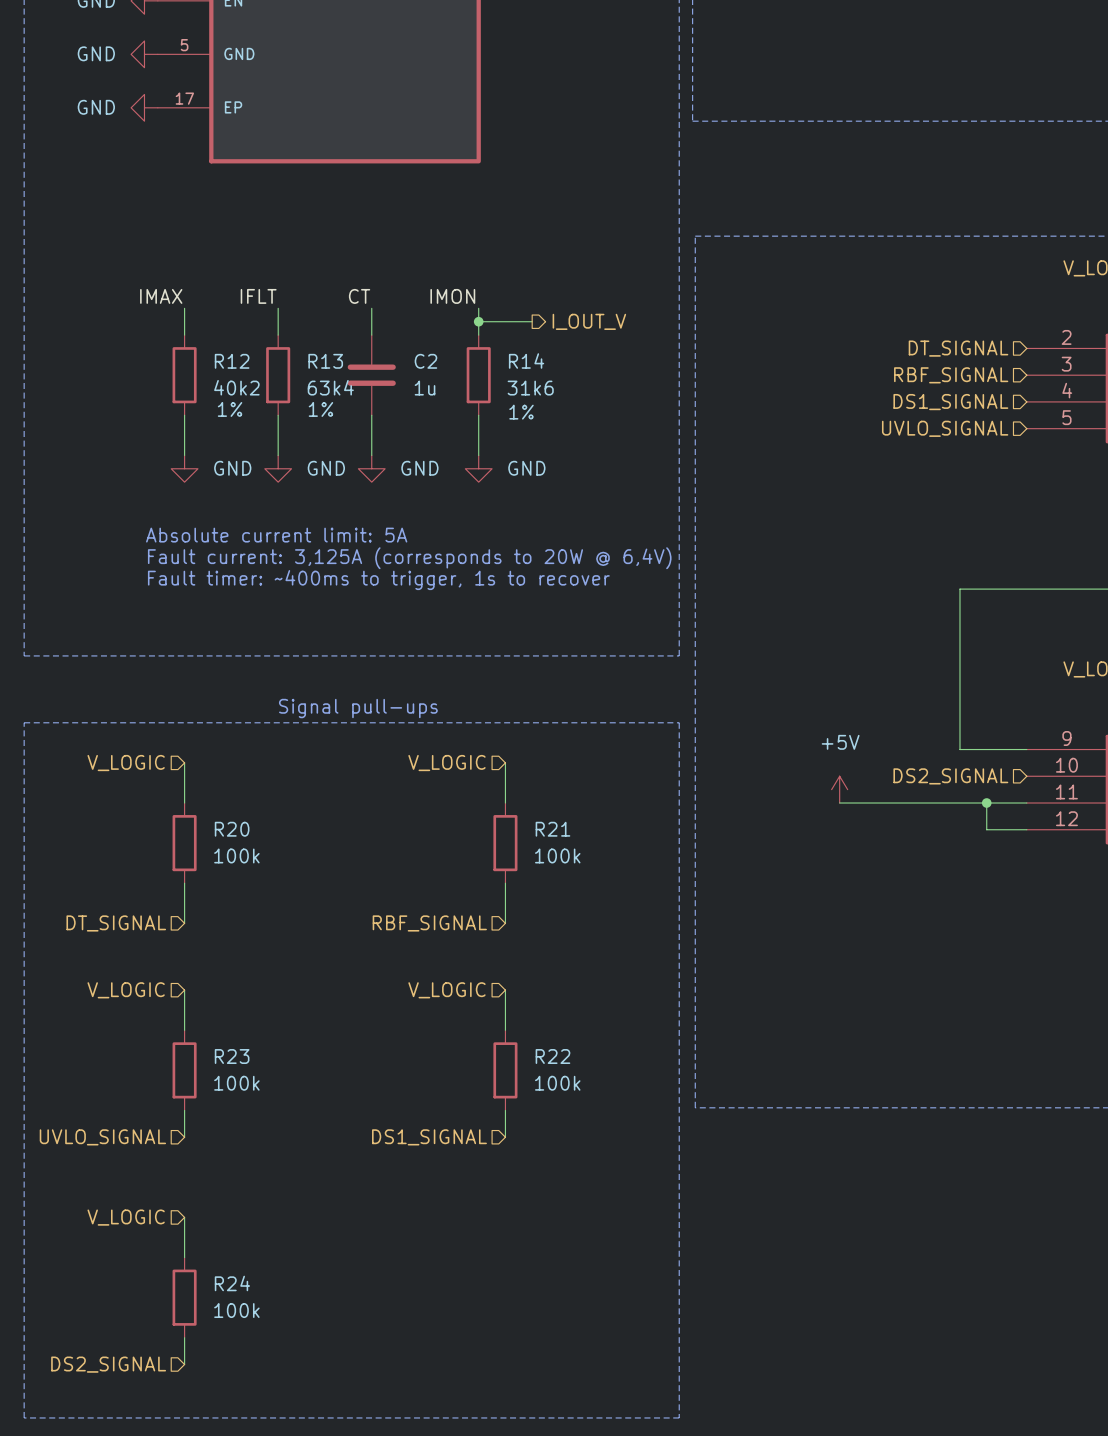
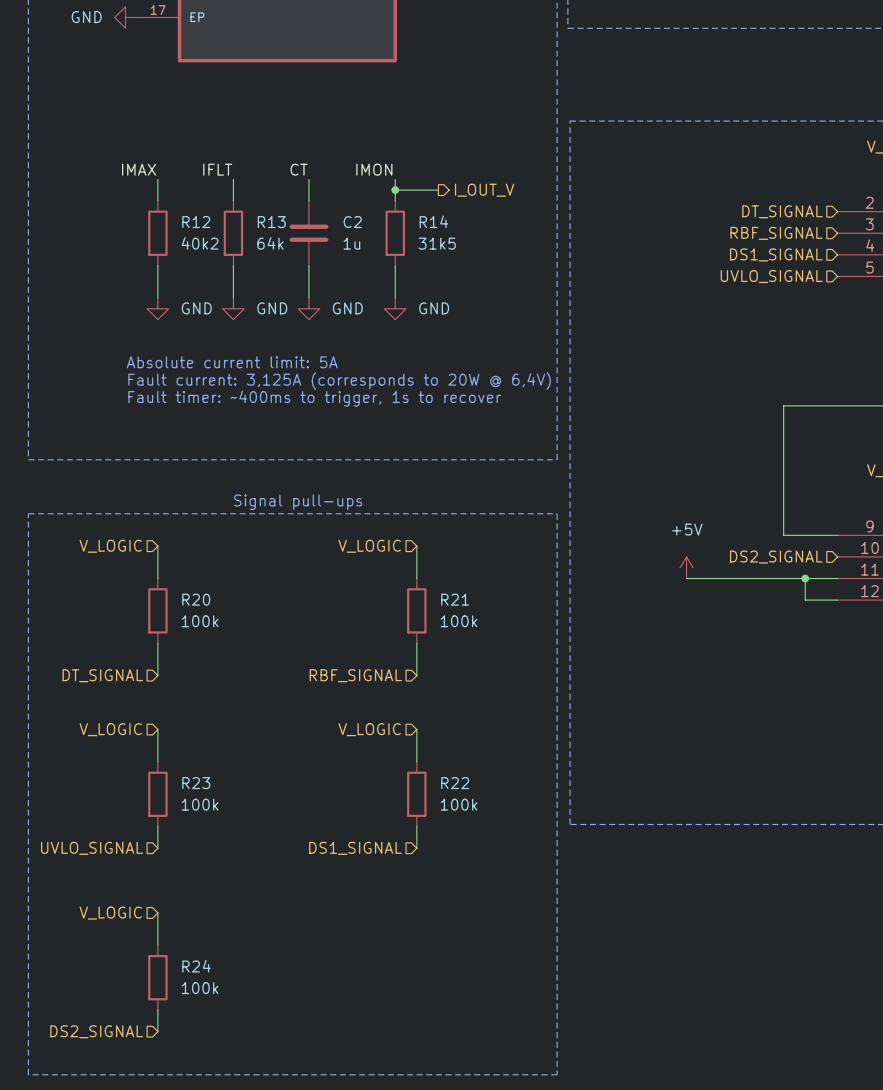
R13 value: 63k4 (330, 387) -> 64k (270, 243)
R14 value: 31k6 (530, 388) -> 31k5 (437, 243)
R12 text: 1% (230, 409) -> none
R13 text: 1% (320, 409) -> none
R14 text: 1% (521, 412) -> none

